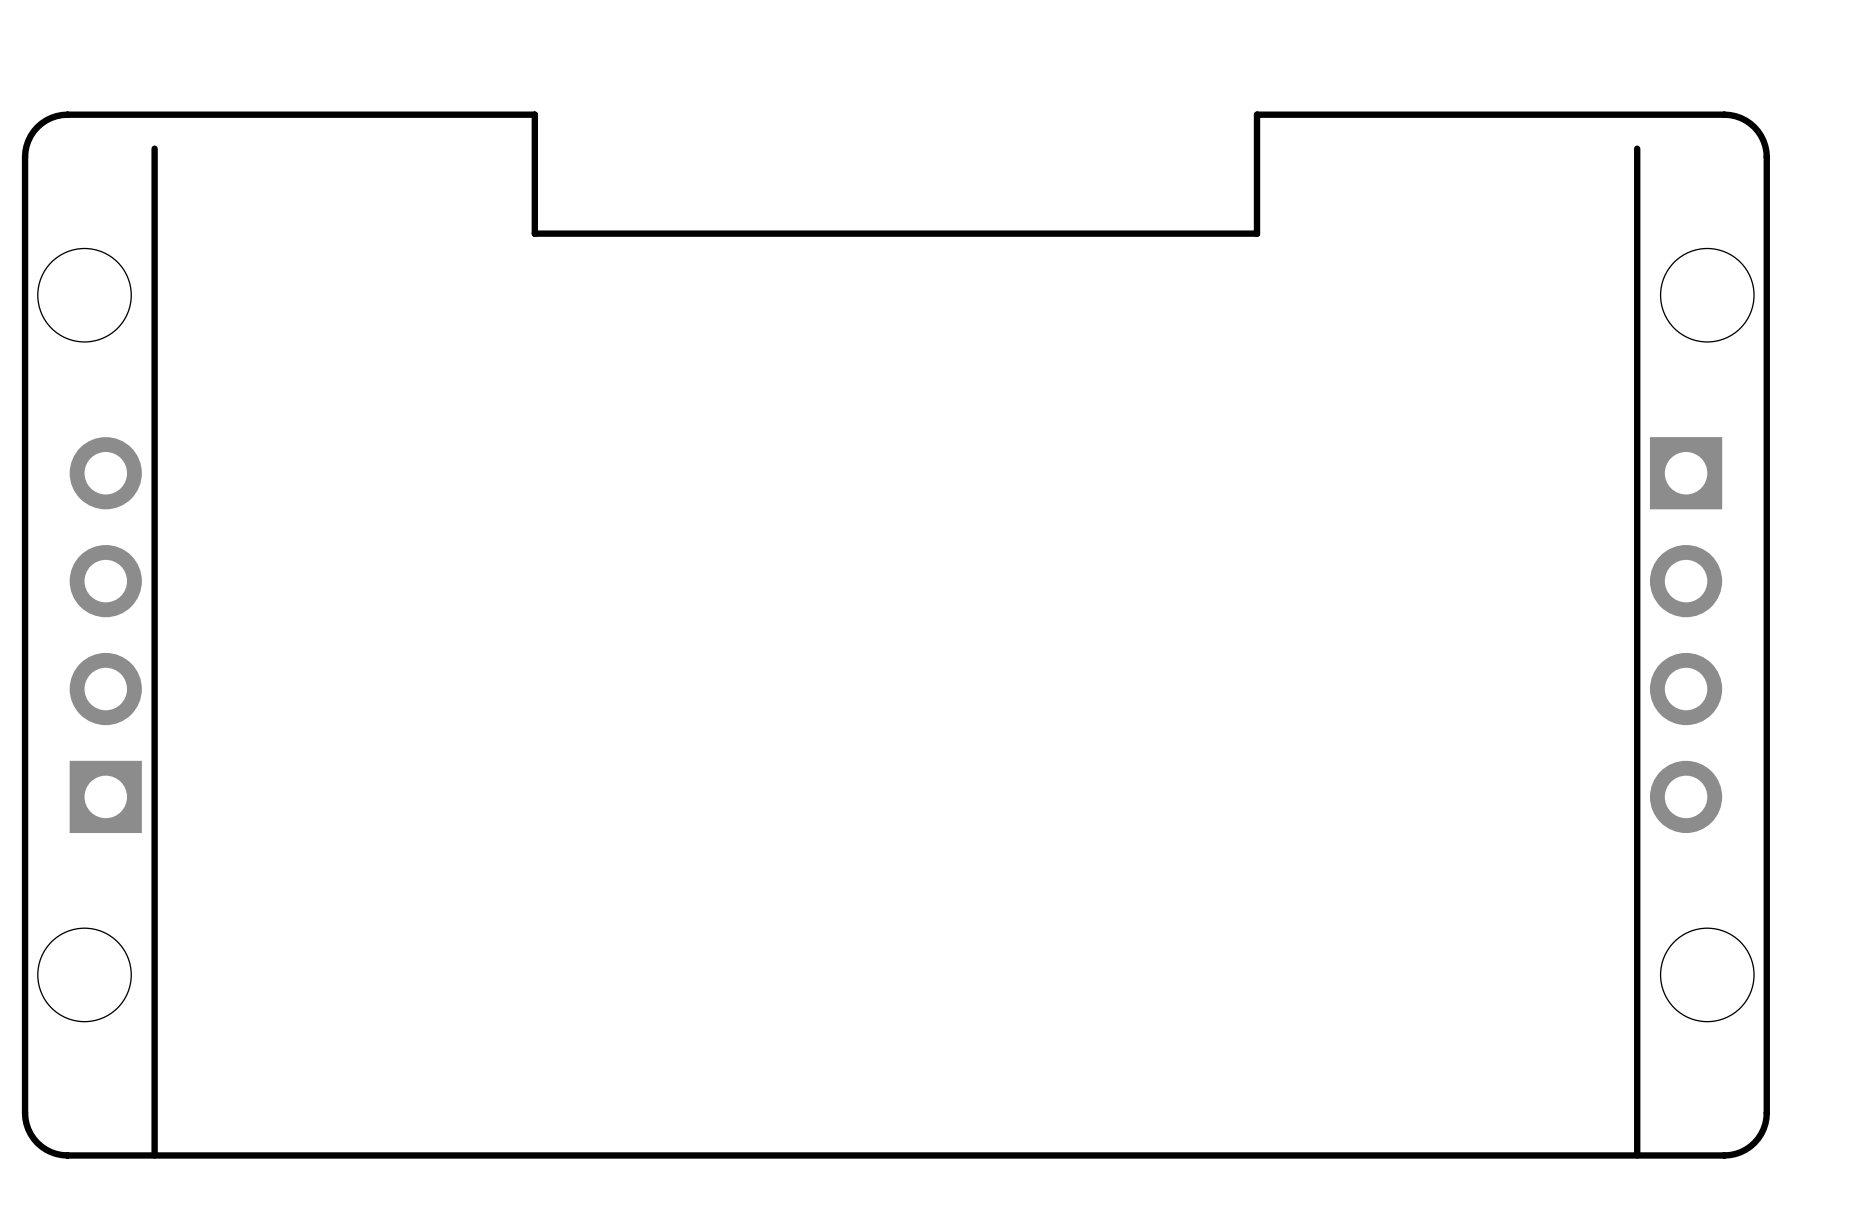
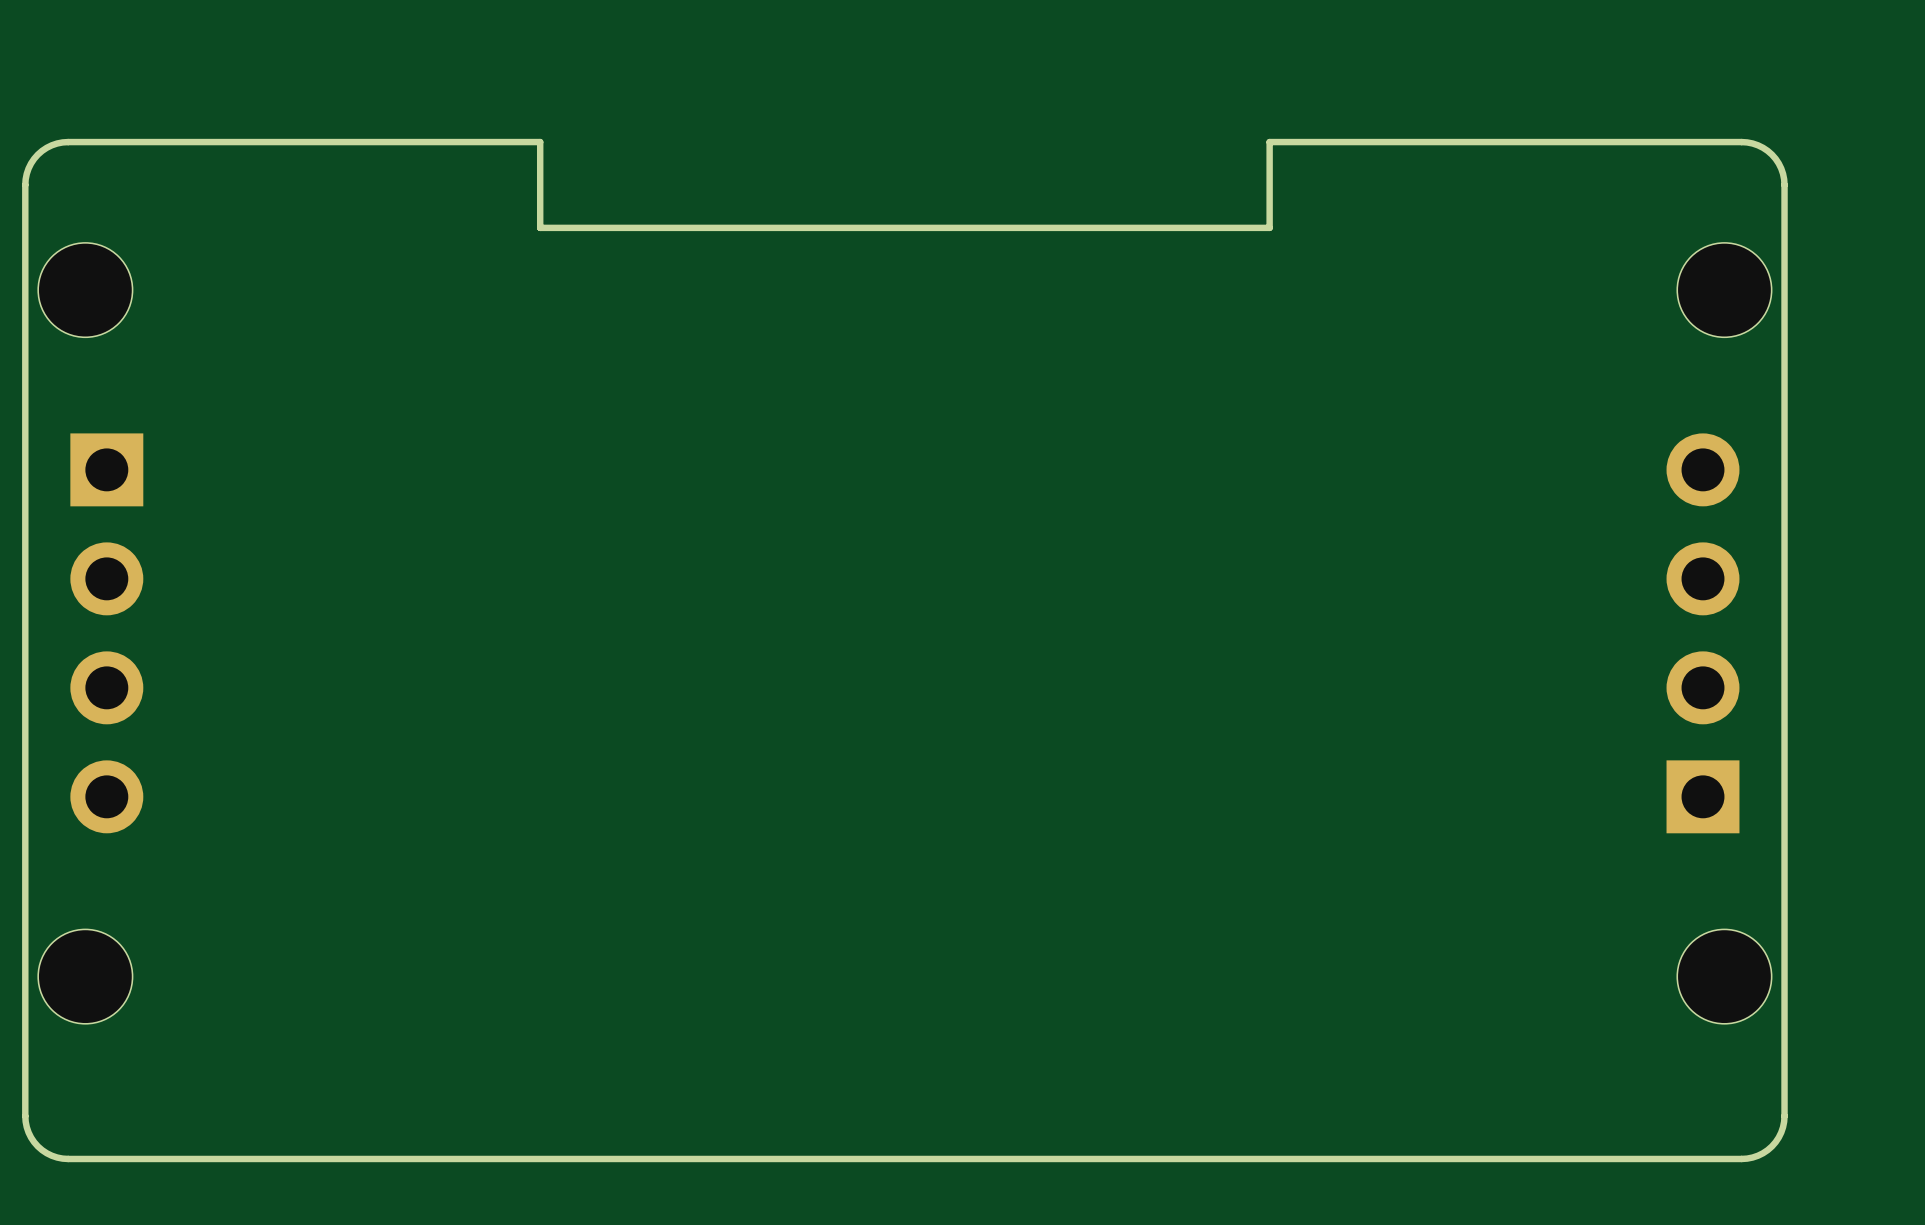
line: (154, 148) (154, 1155) -> none
board edge: (534, 148) (534, 114) (61, 115) (41, 123) (28, 140) (25, 157) (25, 191) -> (540, 142) (62, 142) (46, 147) (34, 158) (26, 173) (25, 184)
board edge: (1257, 148) (1257, 114) (1729, 115) (1750, 123) (1763, 140) (1766, 157) (1766, 191) -> (1269, 142) (1747, 142) (1763, 147) (1775, 158) (1783, 173) (1784, 184)
line: (1637, 148) (1637, 1155) -> none
part rotation: 0° (105, 635) -> 180° (106, 633)
part rotation: 0° (1686, 635) -> 180° (1703, 633)

